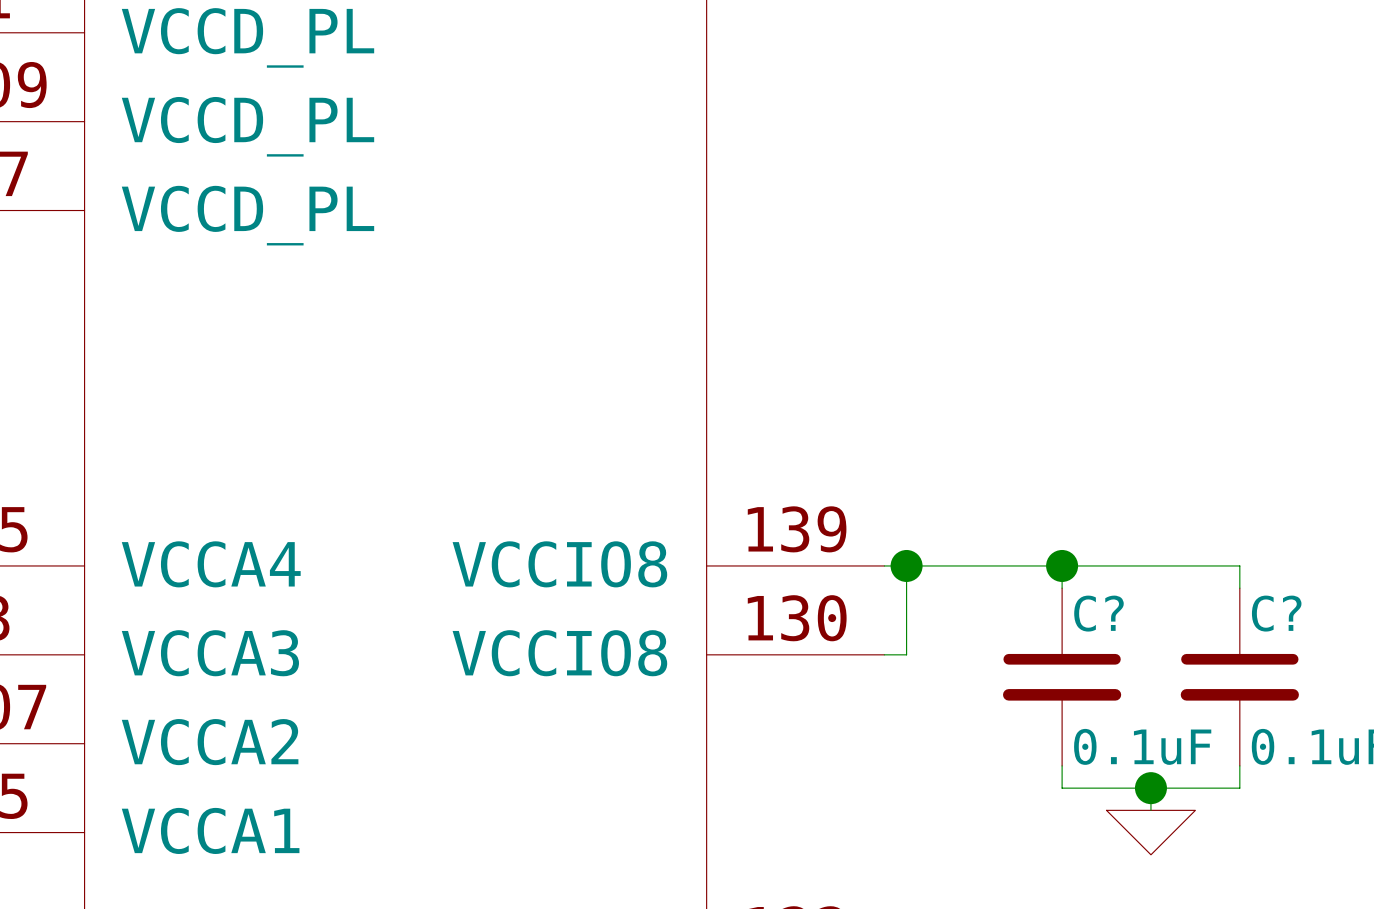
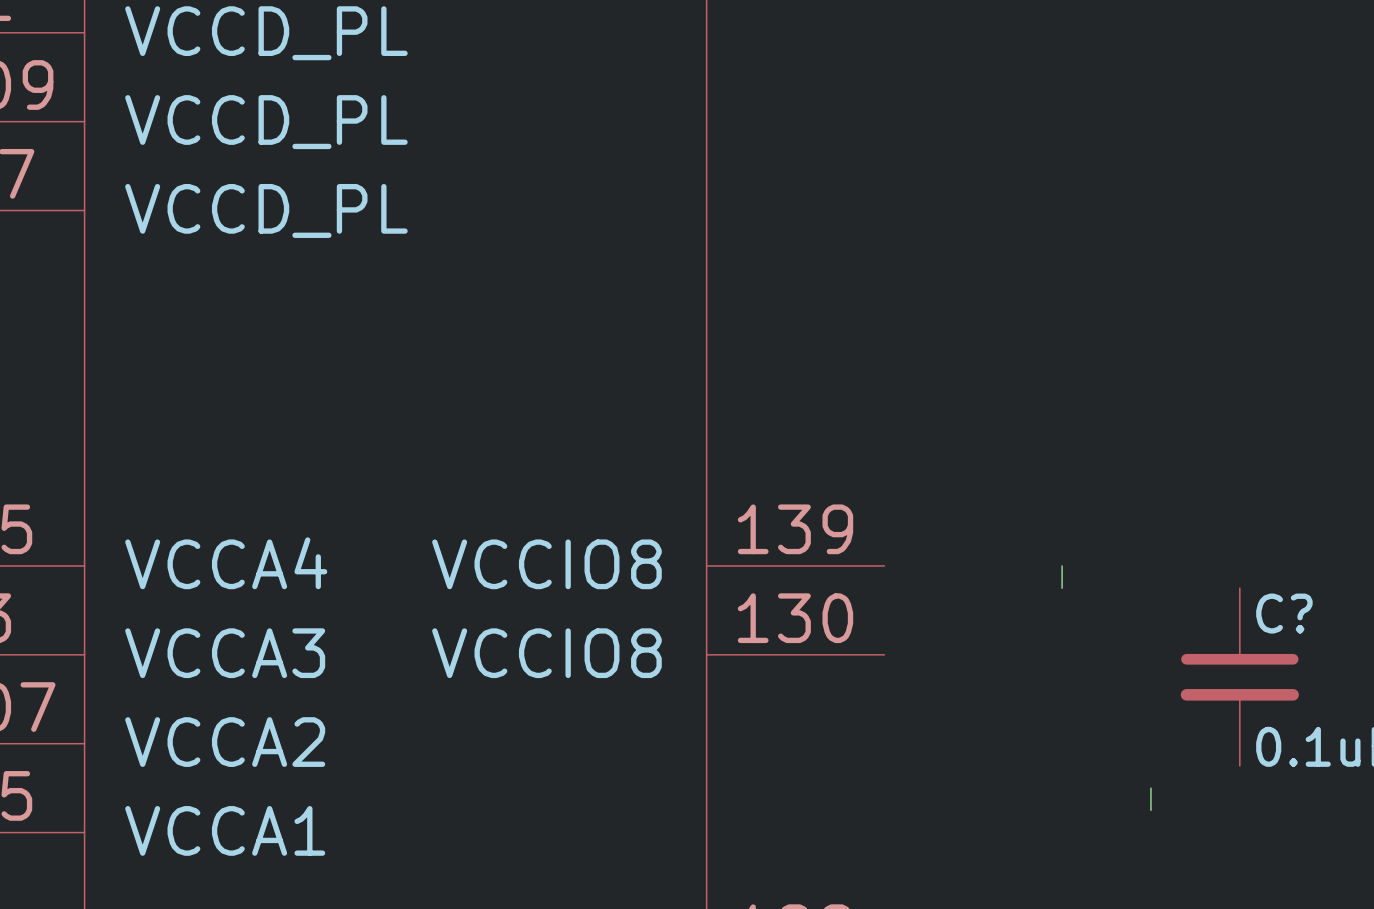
wire: (884, 565) (1239, 565) (1239, 588) -> none
wire: (906, 565) (906, 654) (884, 654) -> none
junction: (906, 565) -> none
junction: (1062, 565) -> none
C?: 0.1uF (1062, 677) -> none
wire: (1062, 765) (1062, 788) (1239, 788) (1239, 765) -> none
junction: (1150, 788) -> none
power symbol: (1150, 832) -> none

